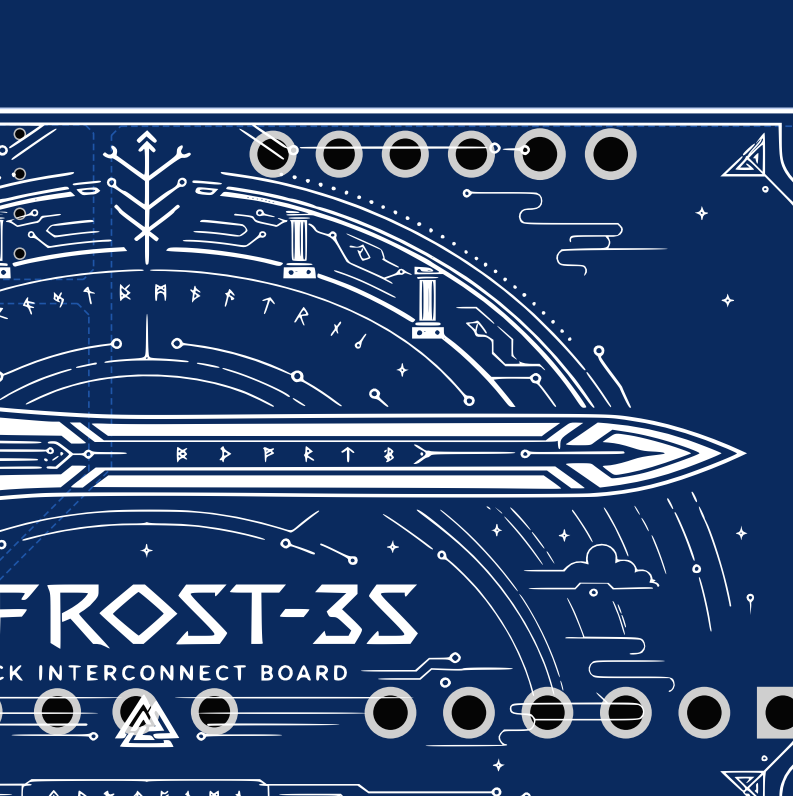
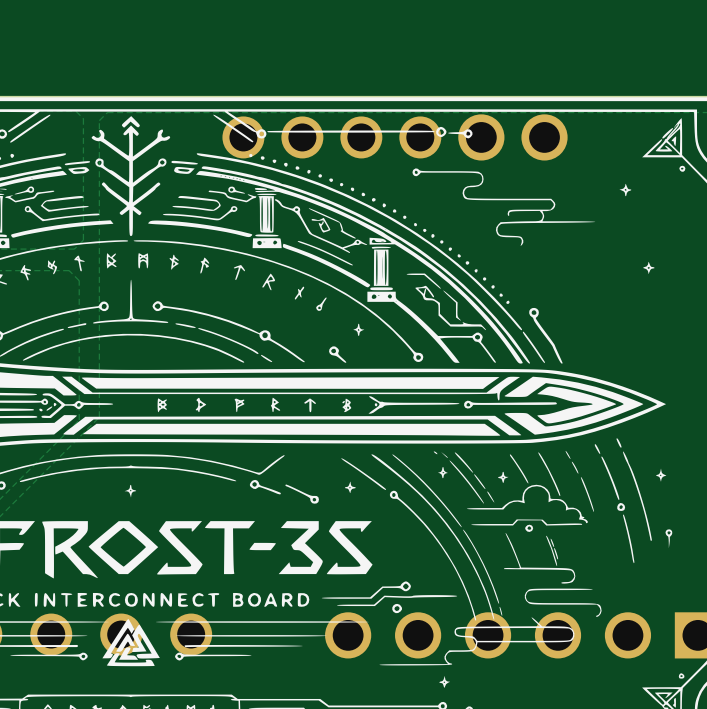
via: (19, 134) -> none
via: (19, 173) -> none
via: (19, 213) -> none
via: (19, 253) -> none

